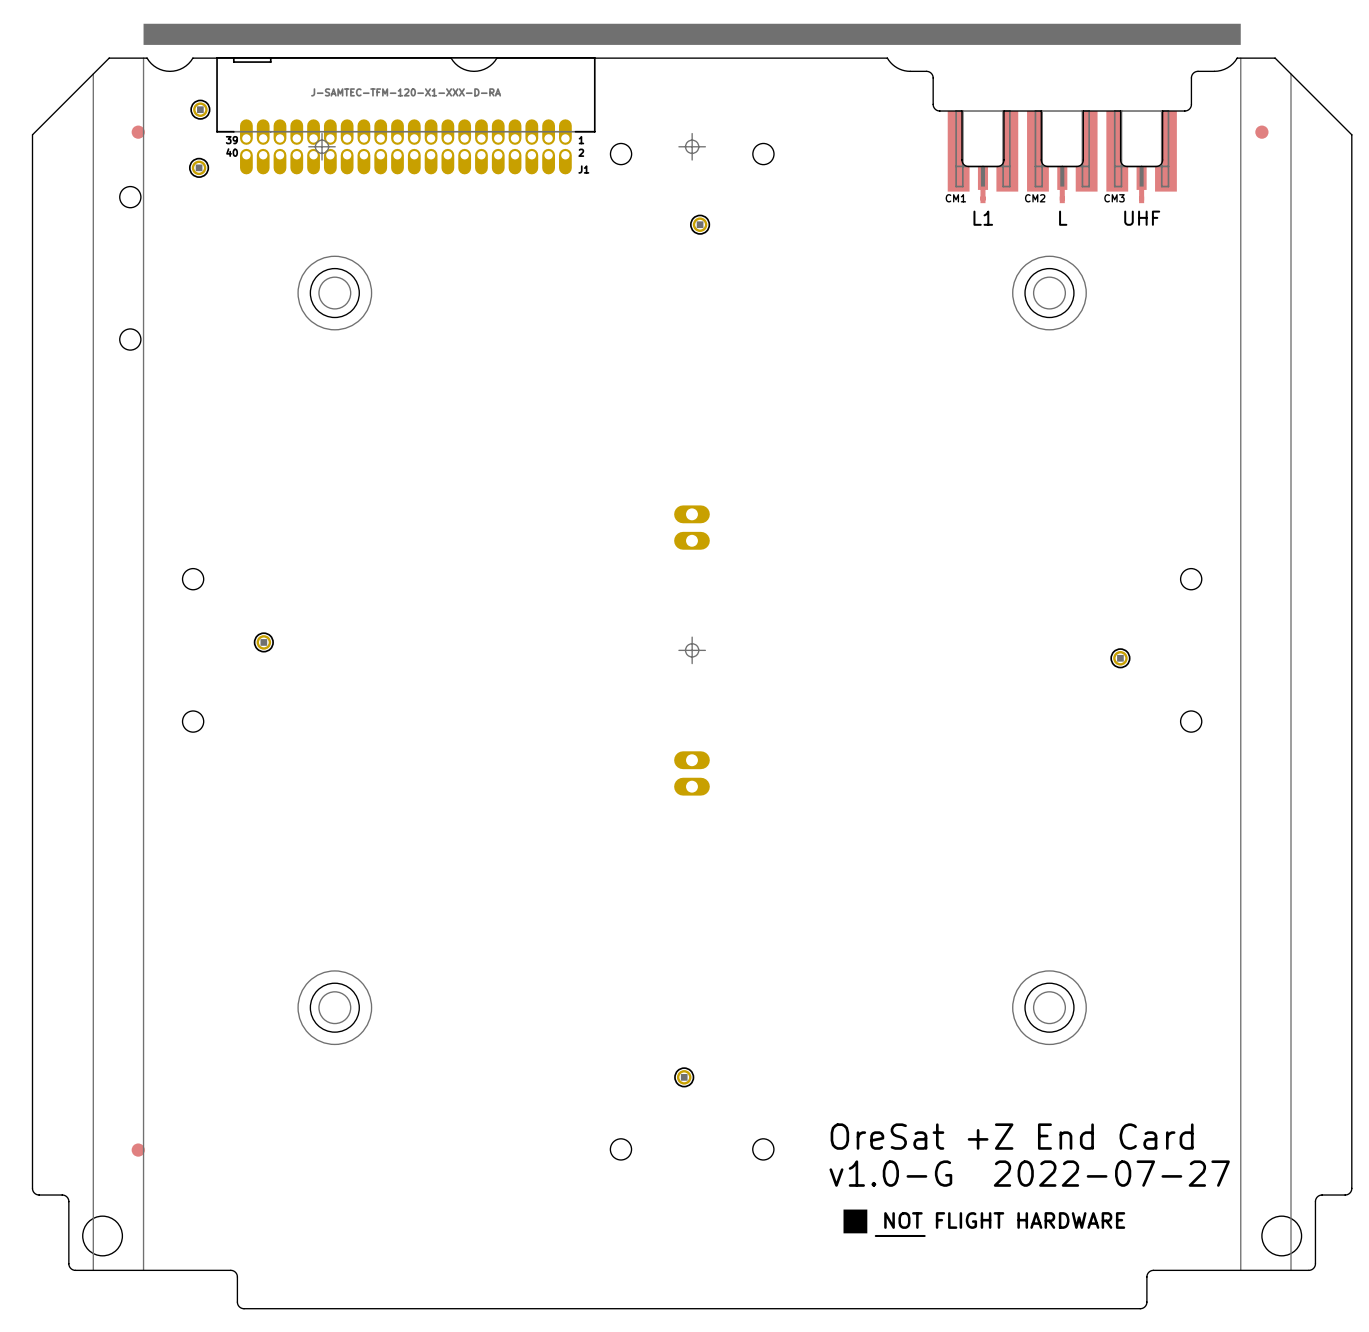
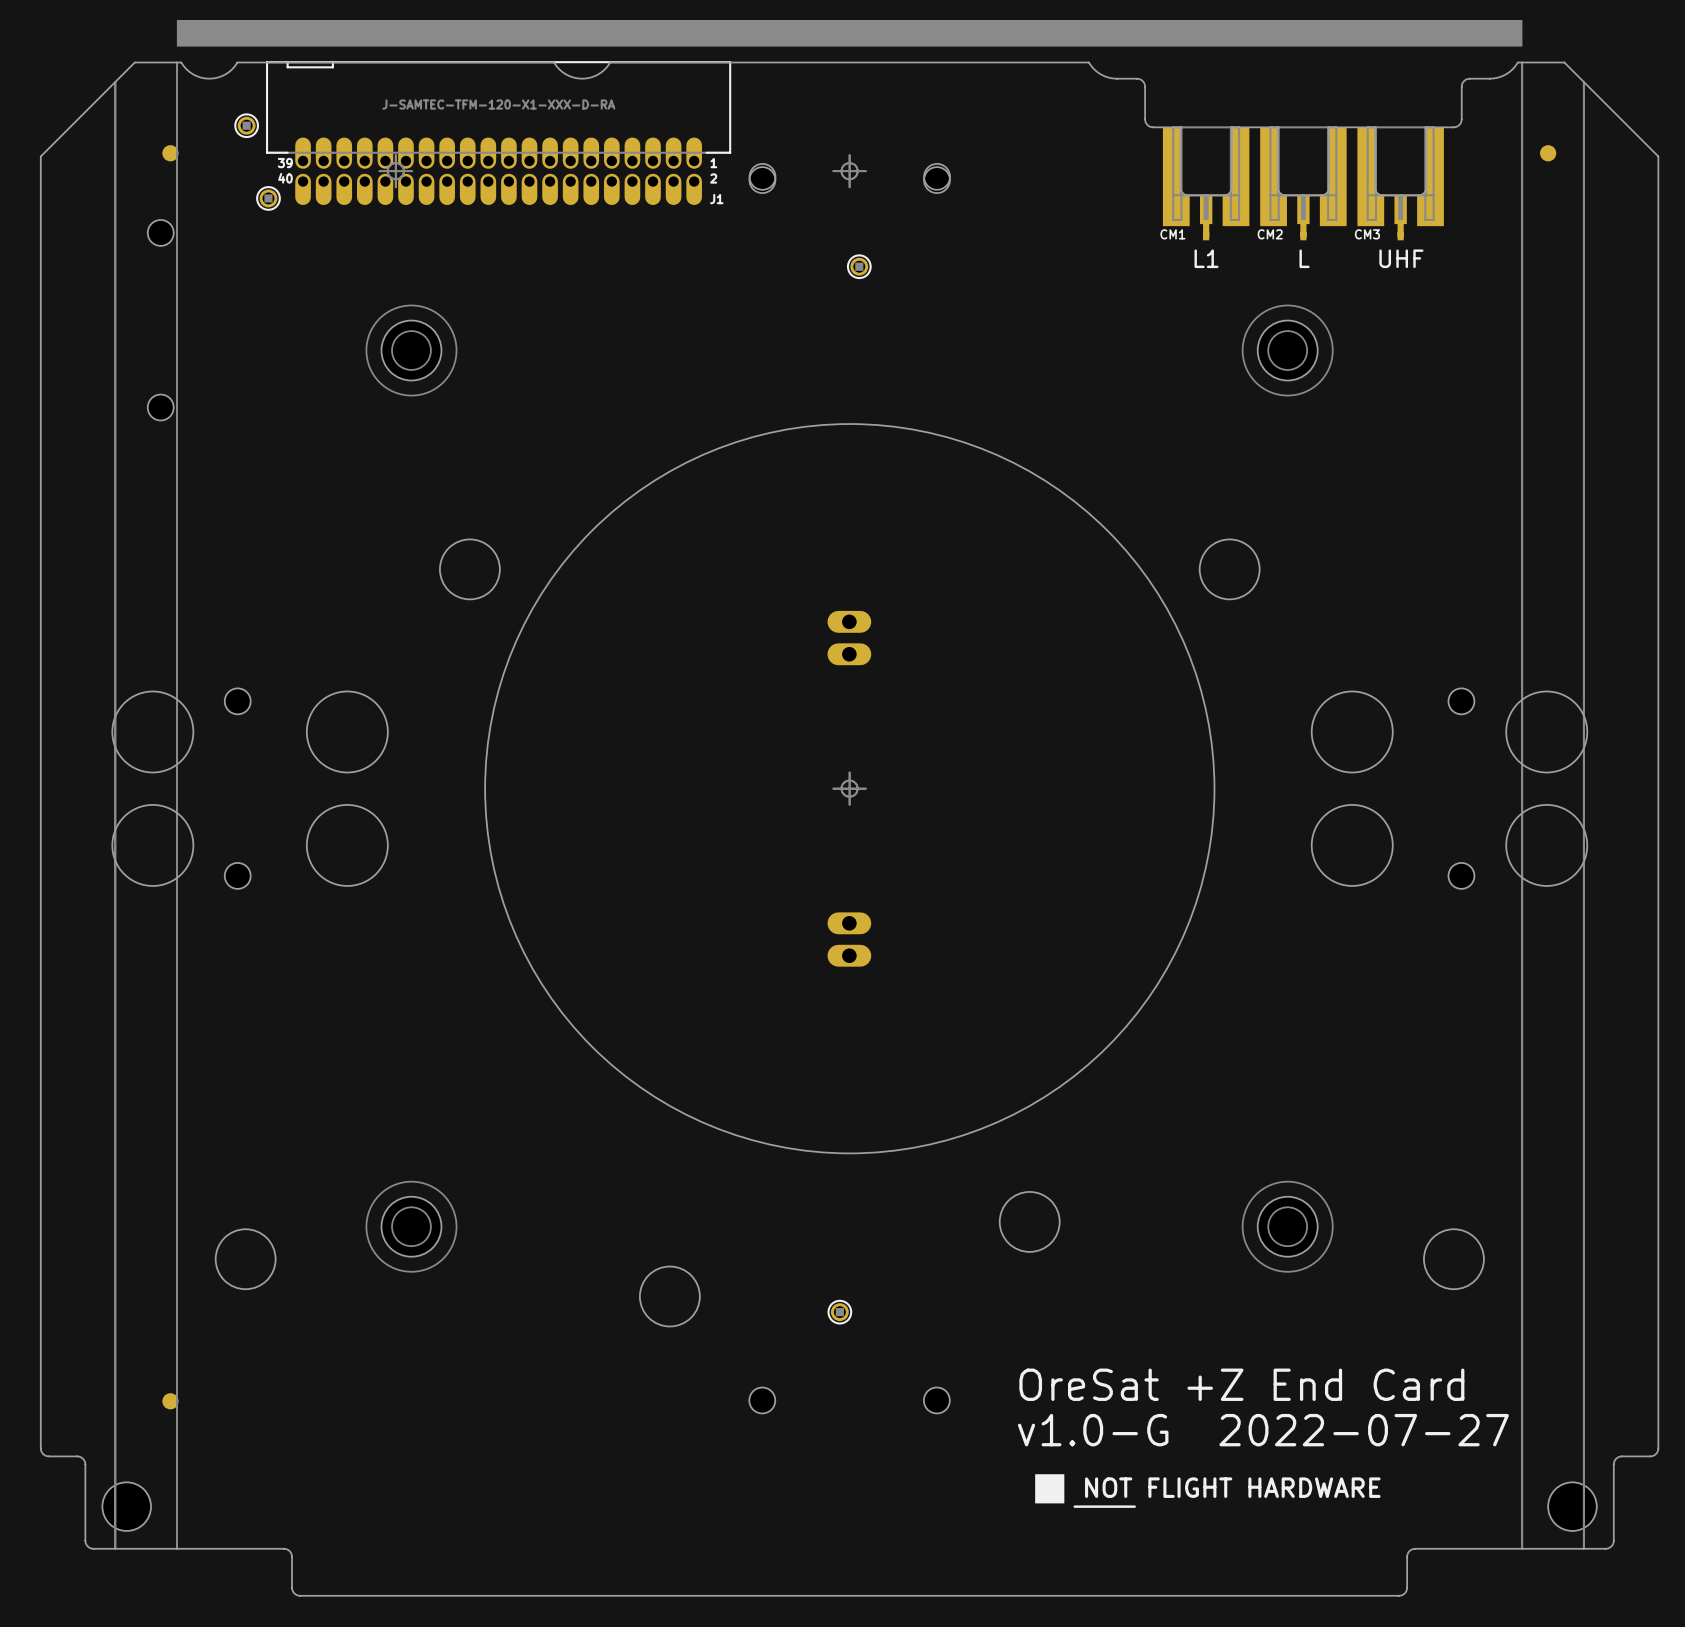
drawing: none -> [115, 20, 1584, 1549]
round board edge: none -> [749, 163, 776, 190]
round board edge: none -> [923, 163, 951, 190]
part position: (199, 167) -> (268, 198)
round board edge: none -> [484, 423, 1215, 1154]
round board edge: none -> [439, 539, 501, 600]
round board edge: none -> [1199, 539, 1260, 600]
round board edge: none -> [112, 691, 194, 773]
round board edge: none -> [306, 691, 389, 773]
round board edge: none -> [1311, 691, 1393, 773]
round board edge: none -> [1506, 691, 1588, 773]
part: (263, 642) -> none
part: (1120, 658) -> none
round board edge: none -> [112, 804, 194, 887]
round board edge: none -> [306, 804, 389, 887]
round board edge: none -> [1311, 804, 1393, 887]
round board edge: none -> [1506, 804, 1588, 887]
round board edge: none -> [999, 1191, 1060, 1253]
round board edge: none -> [215, 1229, 276, 1290]
round board edge: none -> [1423, 1229, 1485, 1290]
round board edge: none -> [639, 1266, 701, 1327]

